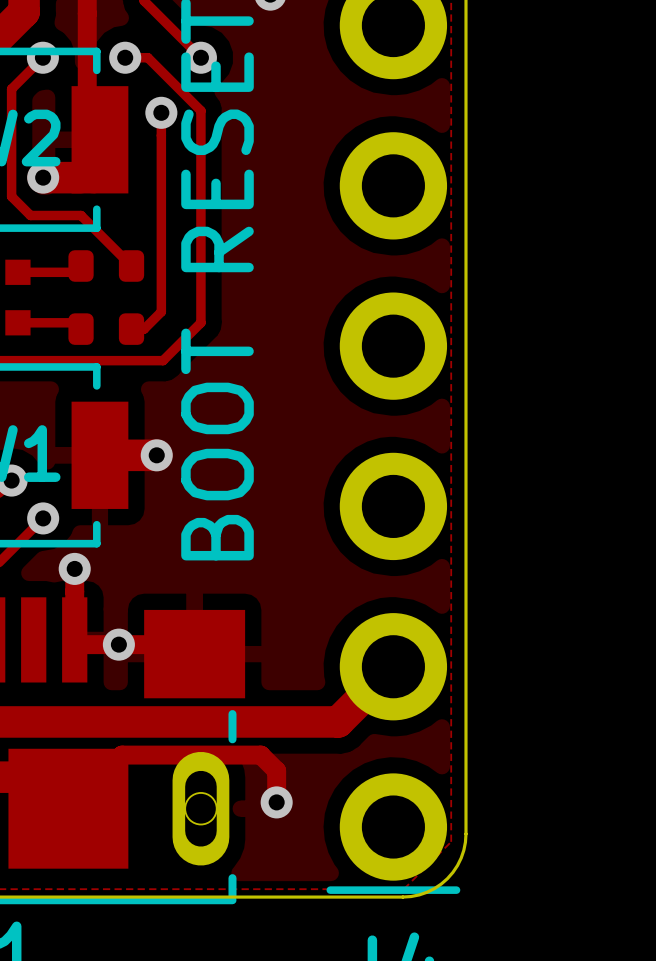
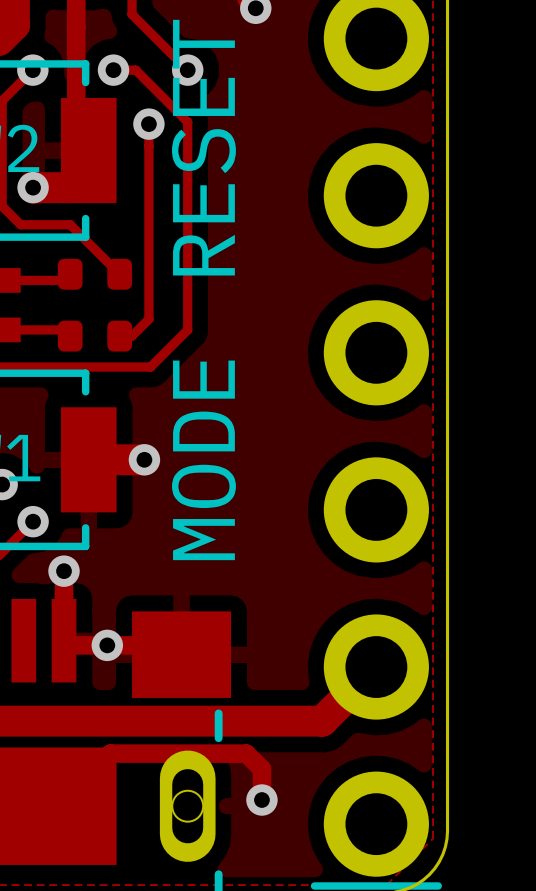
text: BOOT (217, 444) -> MODE (203, 460)

